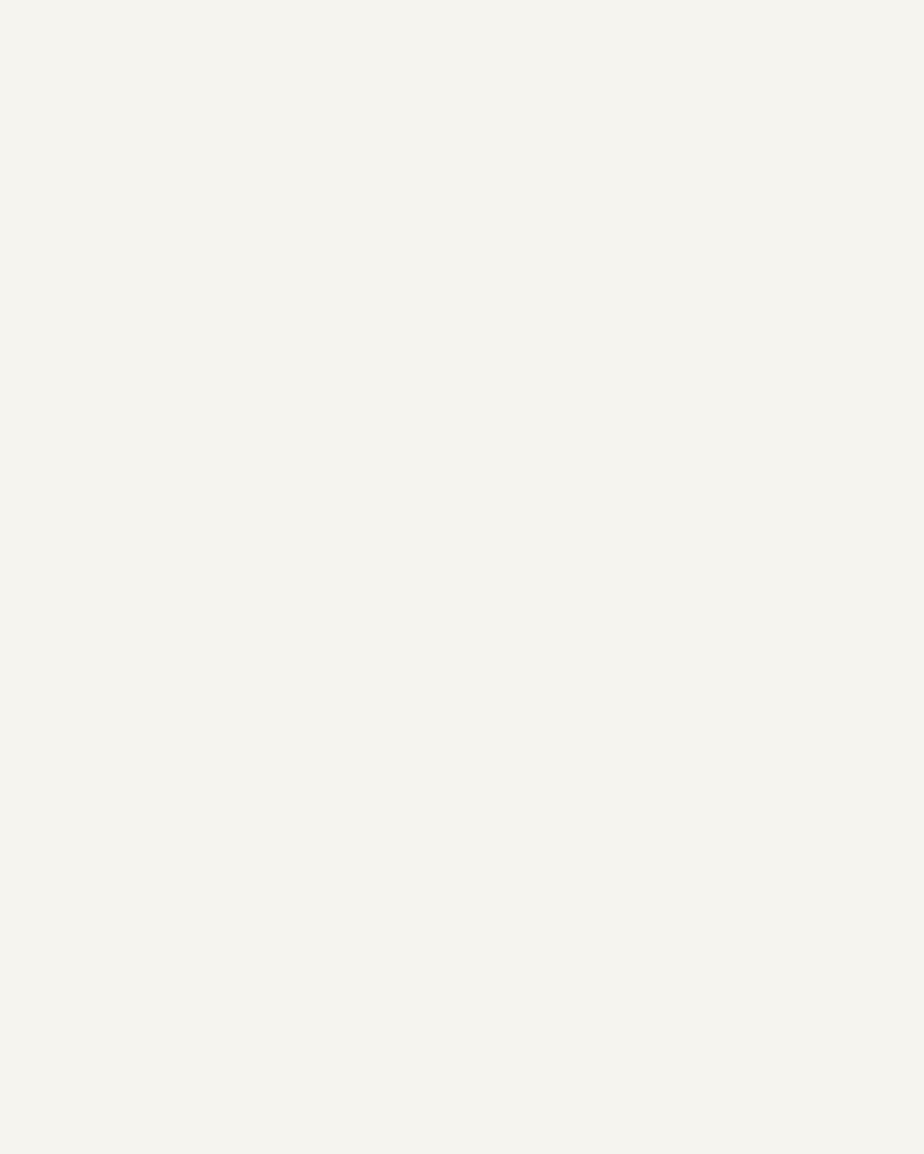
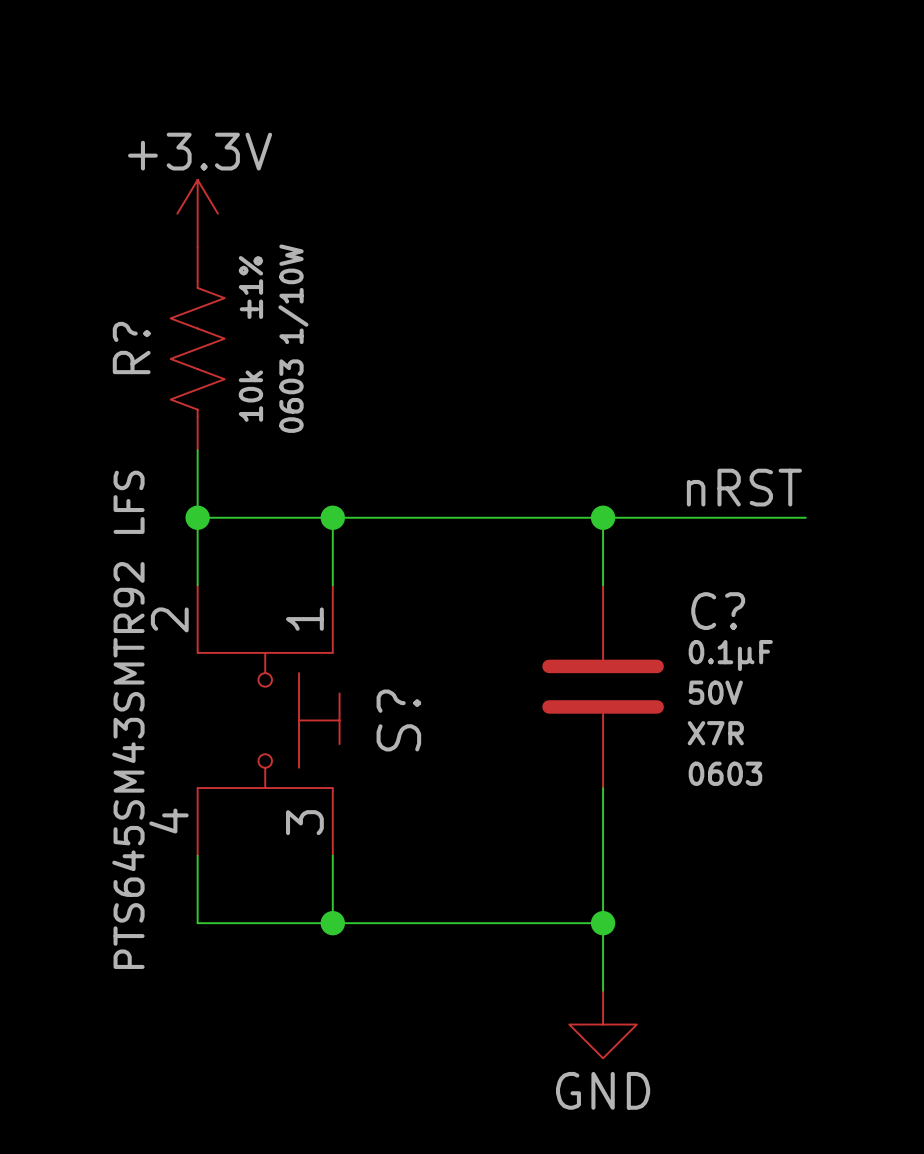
power symbol: none -> +3.3V (197, 213)
R?: none -> (197, 348)
wire: none -> (197, 450) (197, 585)
label: none -> nRST (744, 487)
wire: none -> (197, 517) (805, 517)
junction: none -> (197, 517)
wire: none -> (332, 517) (332, 585)
junction: none -> (332, 517)
wire: none -> (603, 517) (603, 585)
junction: none -> (603, 517)
C?: none -> (603, 686)
S?: none -> (268, 720)
wire: none -> (603, 788) (603, 990)
wire: none -> (197, 855) (197, 923) (603, 923)
wire: none -> (332, 855) (332, 923)
junction: none -> (332, 923)
junction: none -> (603, 923)
power symbol: none -> GND (603, 1024)

